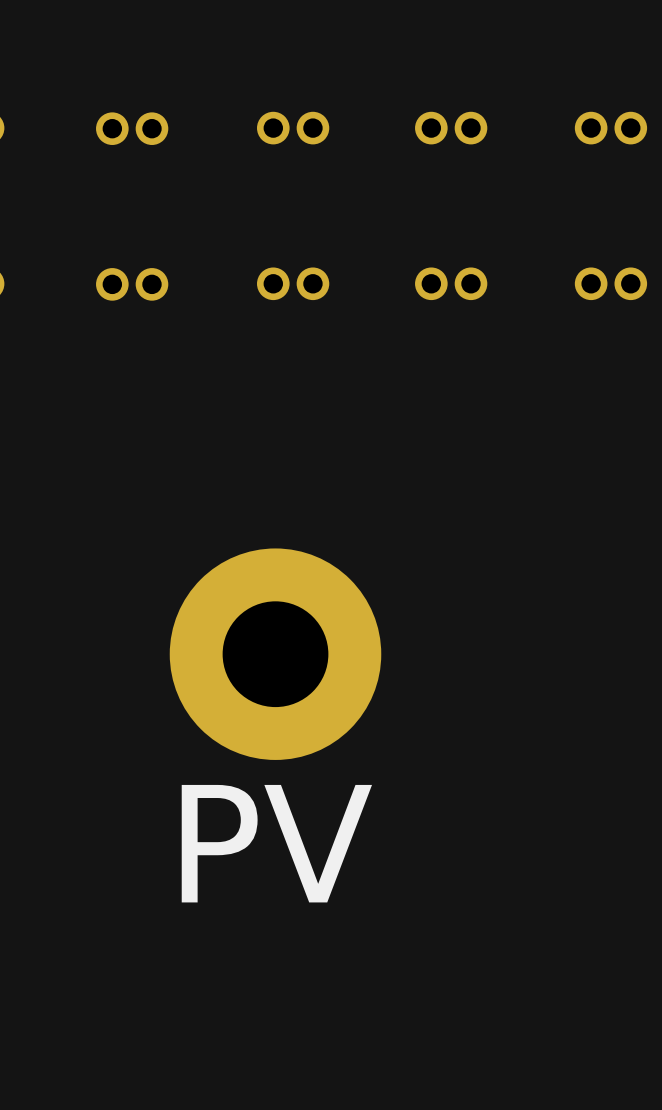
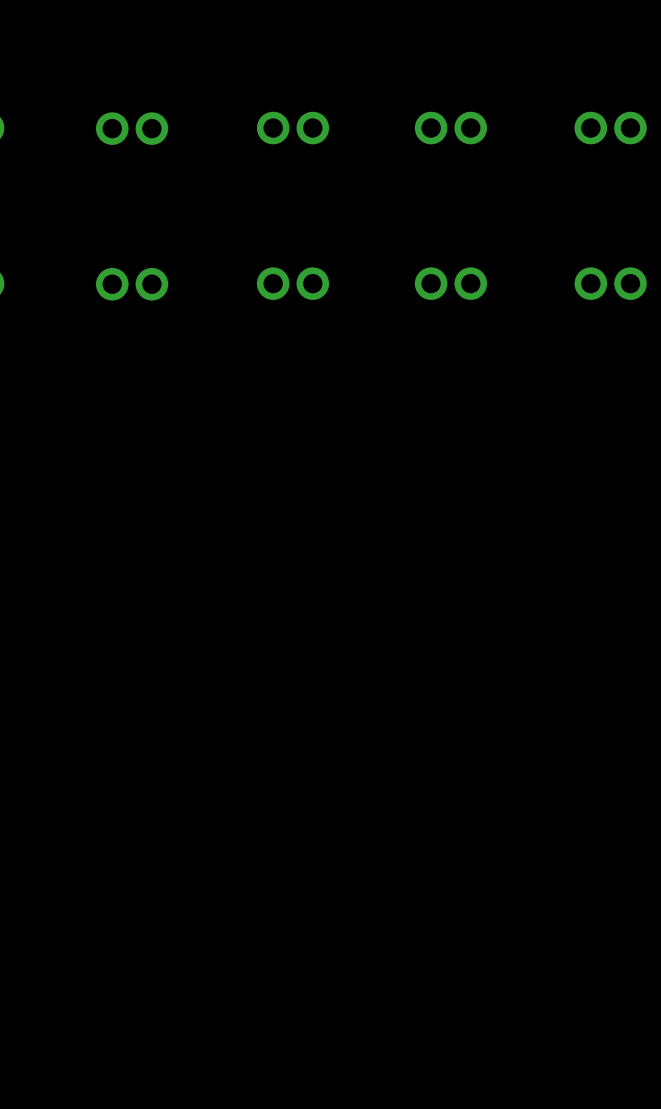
part: (275, 654) -> none
text: PV (276, 843) -> none

